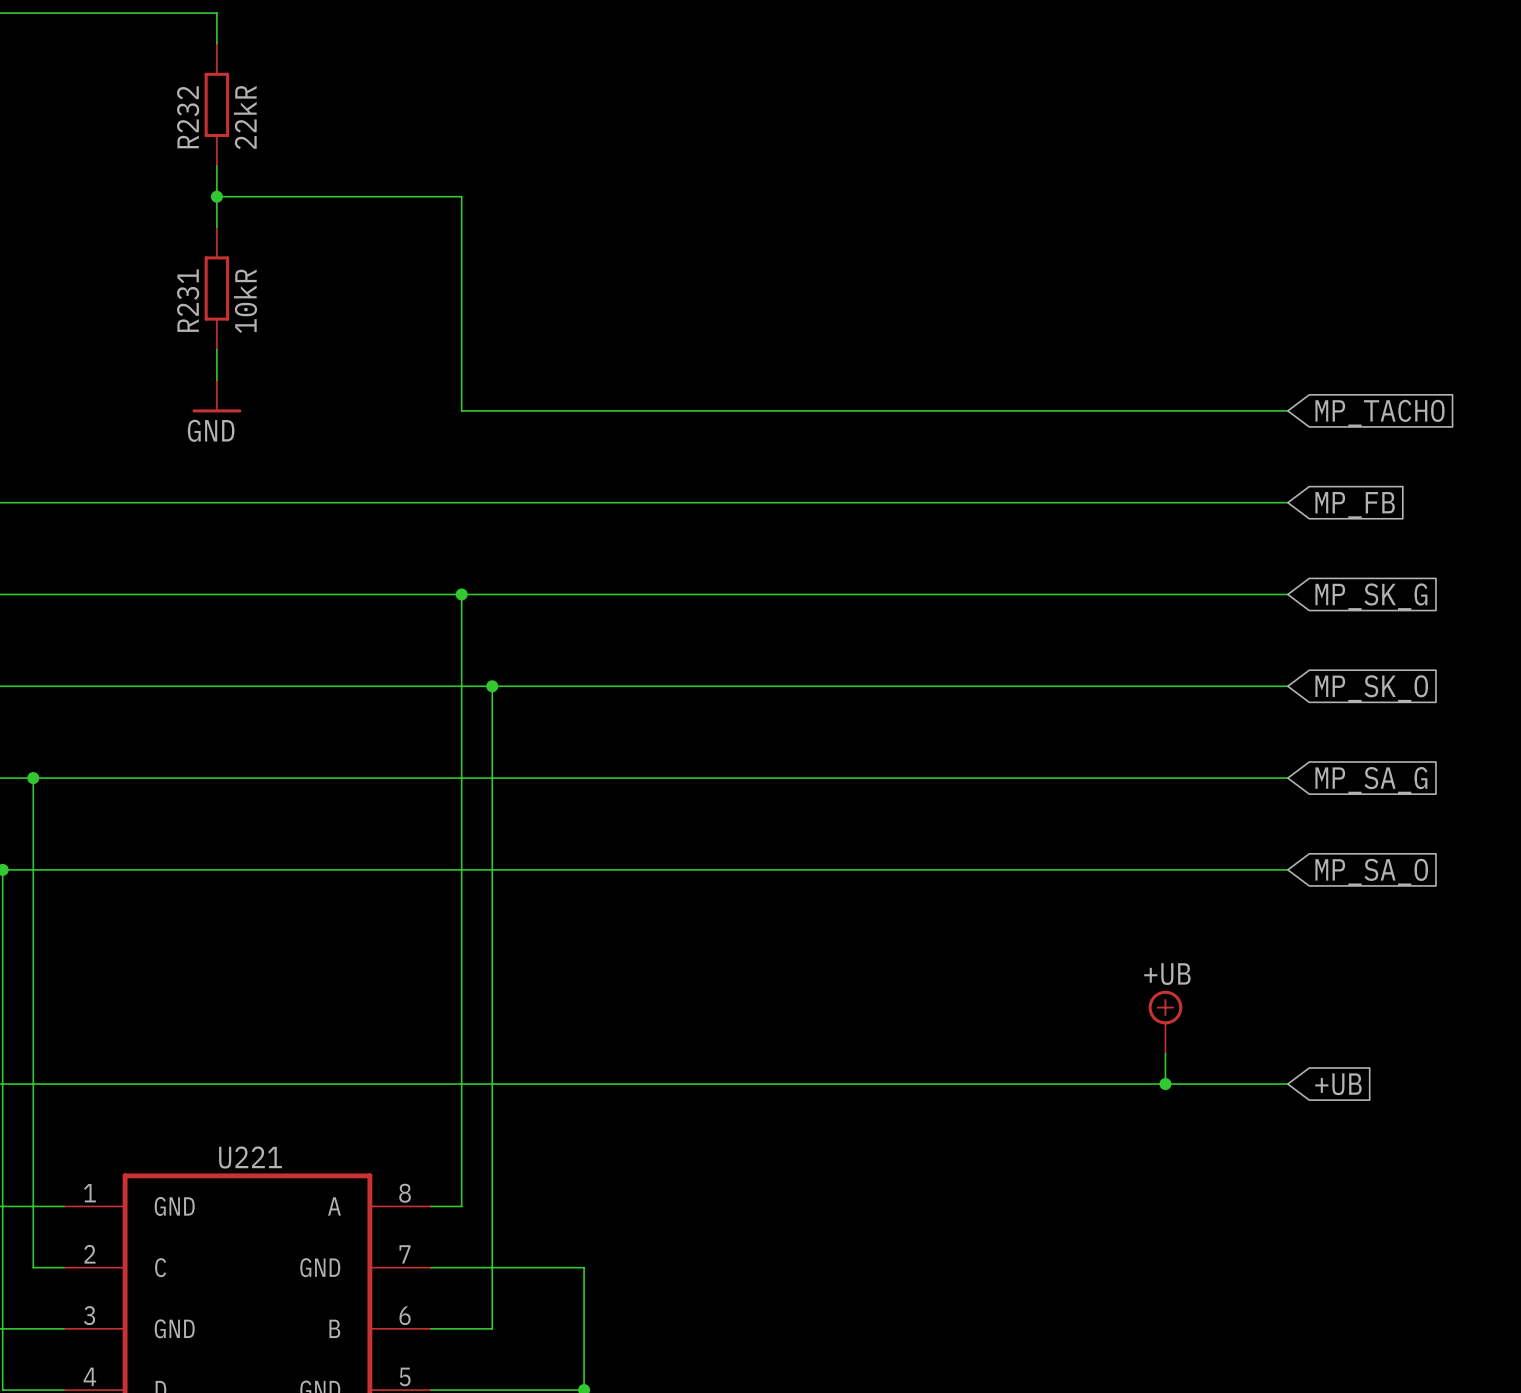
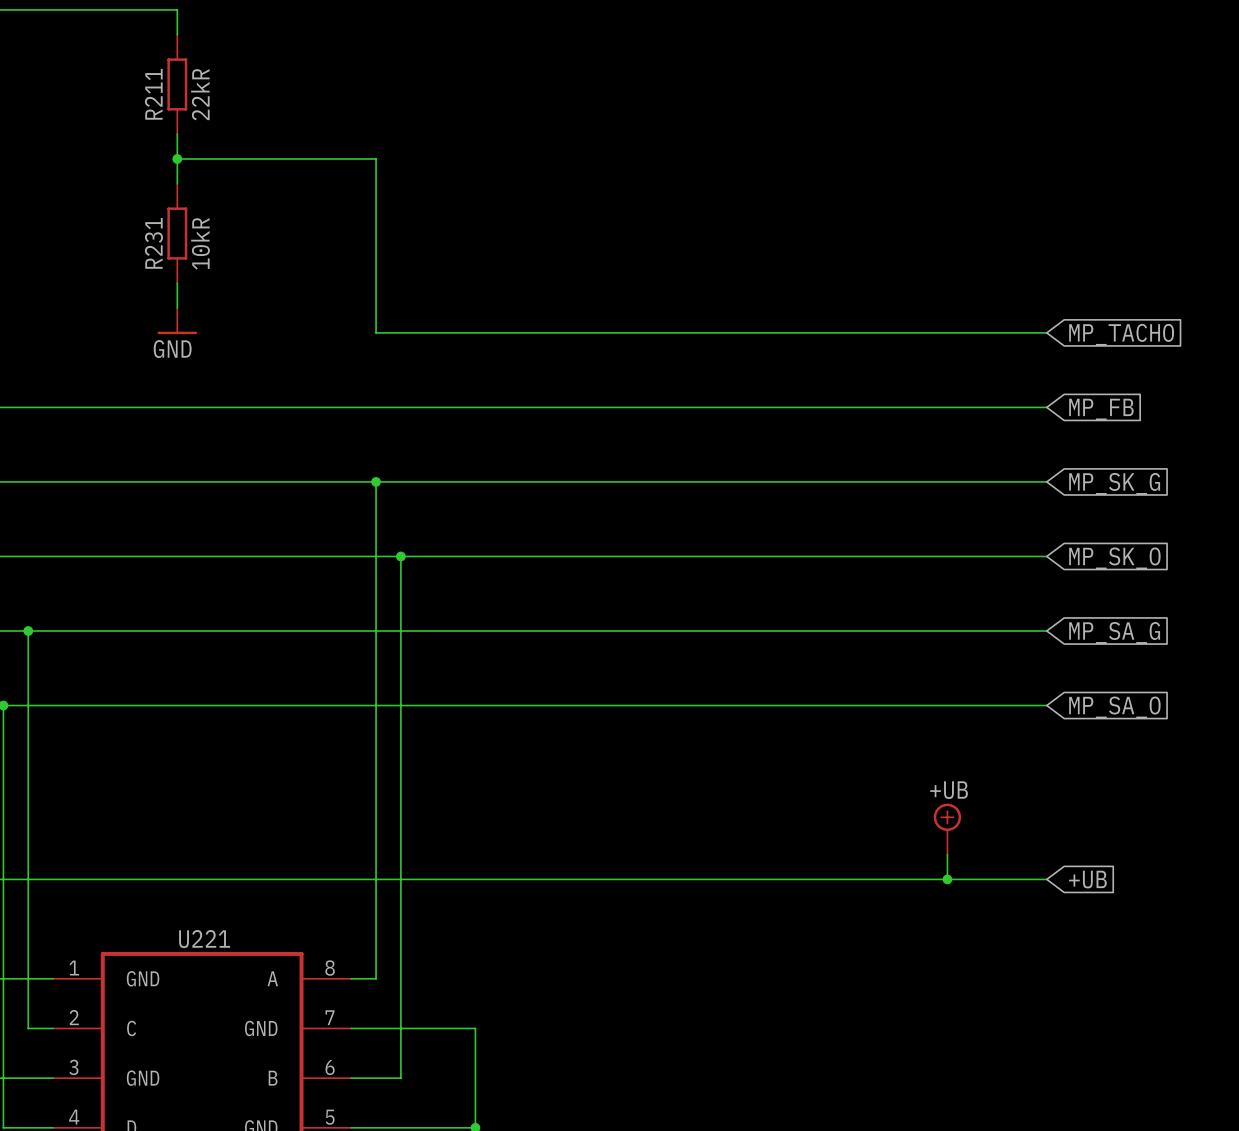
R232 name: R232 (188, 117) -> R211 (153, 94)

